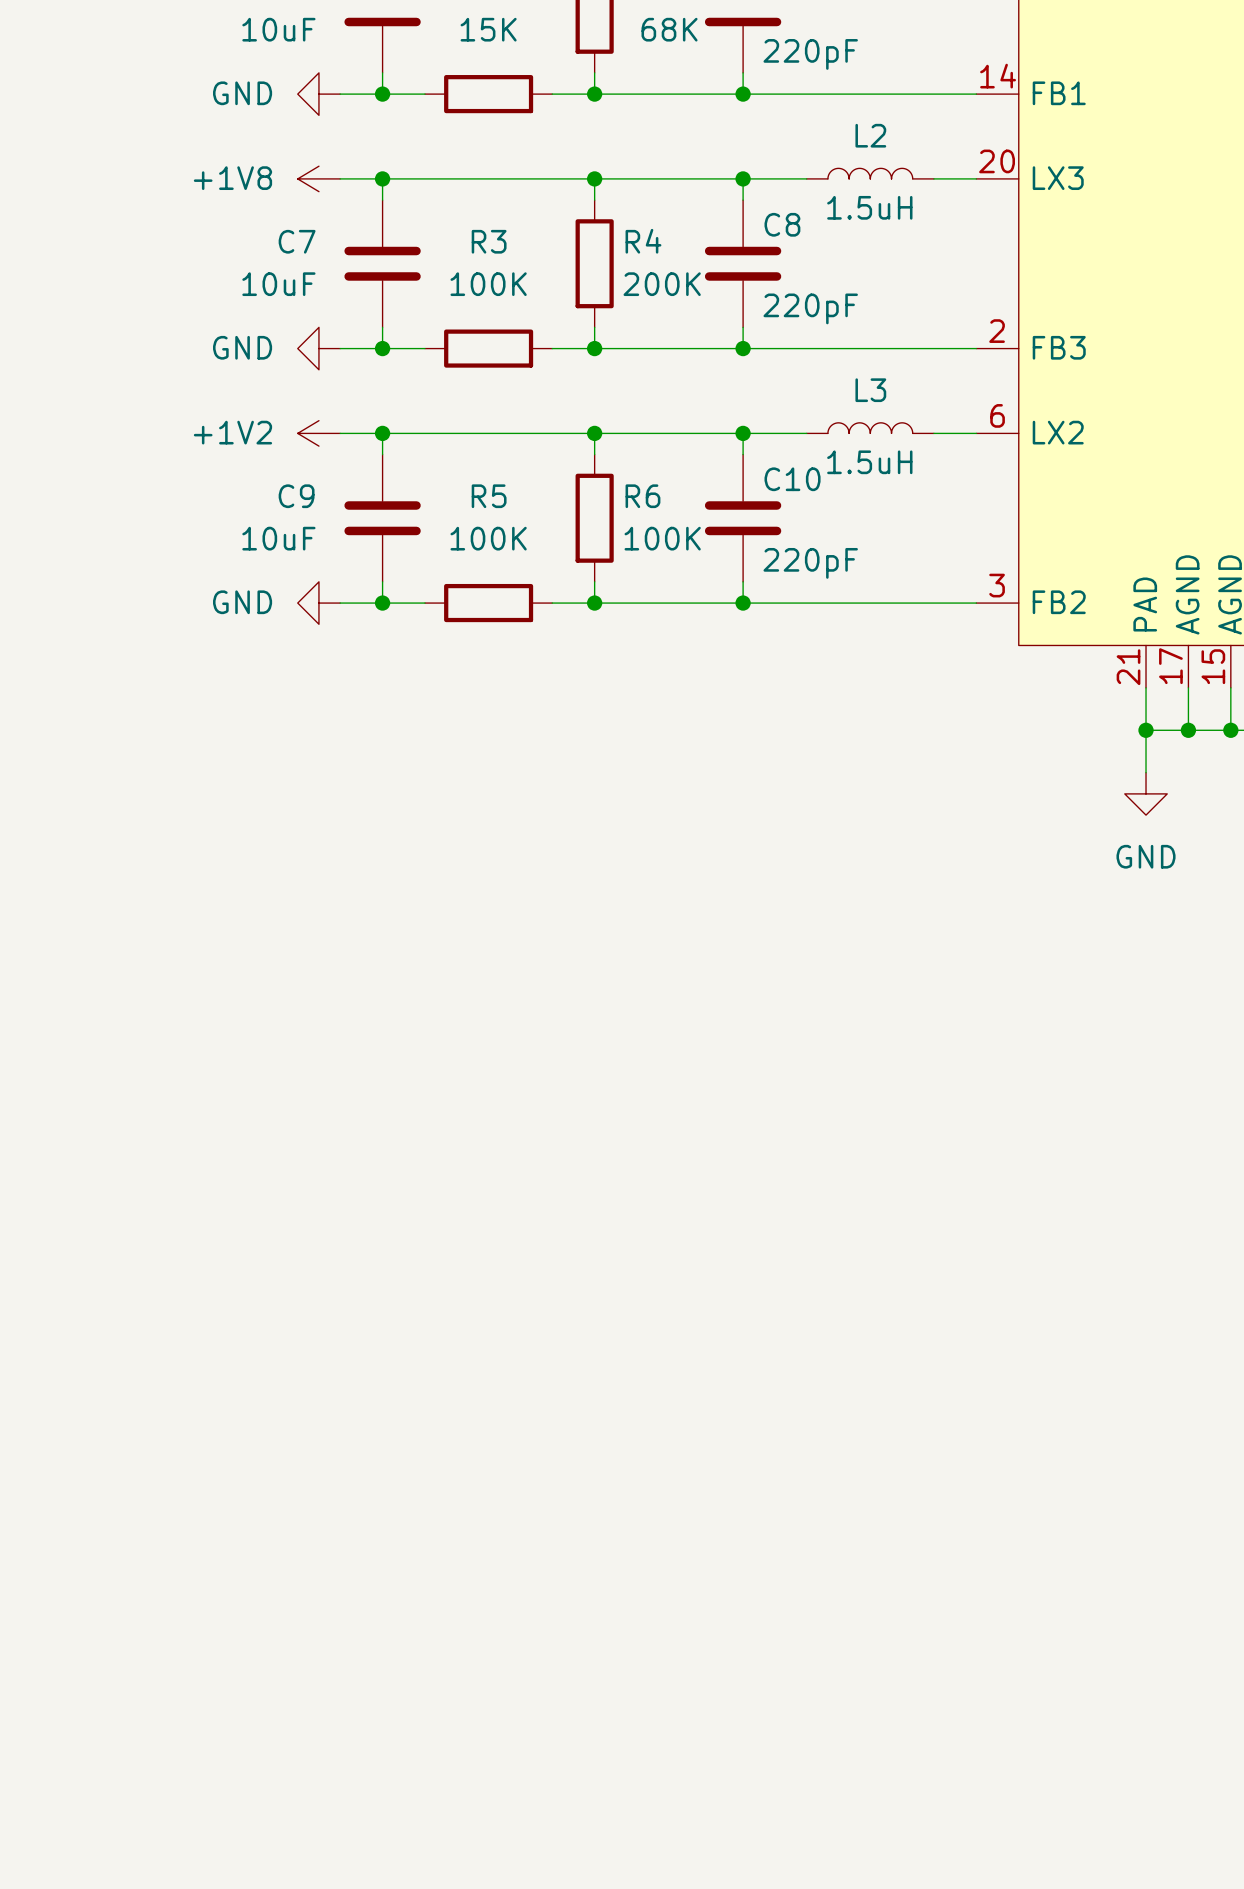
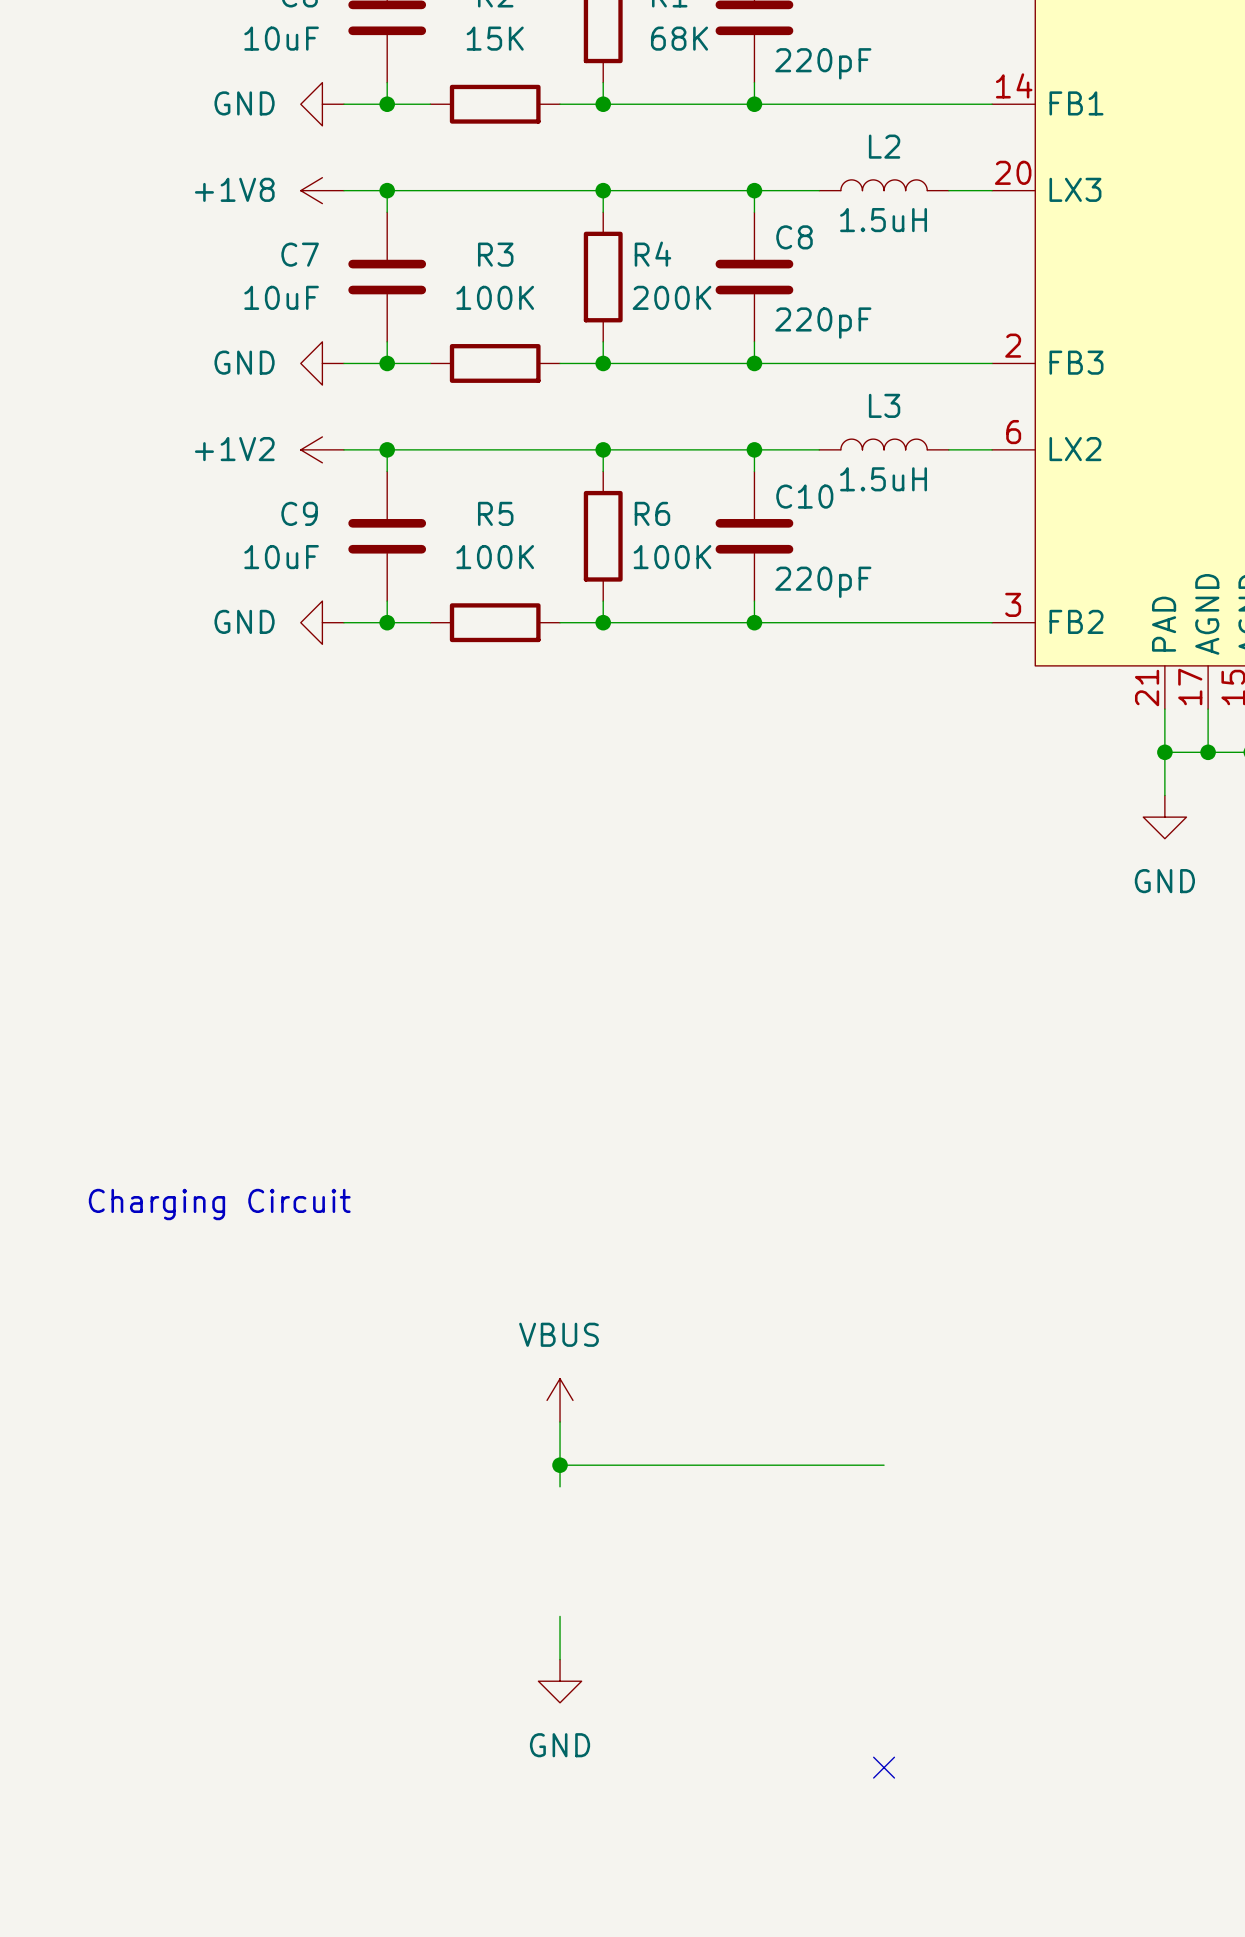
text: none -> Charging Circuit (219, 1204)
power symbol: none -> VBUS (560, 1400)
wire: none -> (560, 1421) (560, 1486)
wire: none -> (560, 1465) (884, 1465)
junction: none -> (560, 1465)
wire: none -> (560, 1616) (560, 1659)
power symbol: none -> GND (560, 1681)
no-connect mark: none -> (884, 1767)

